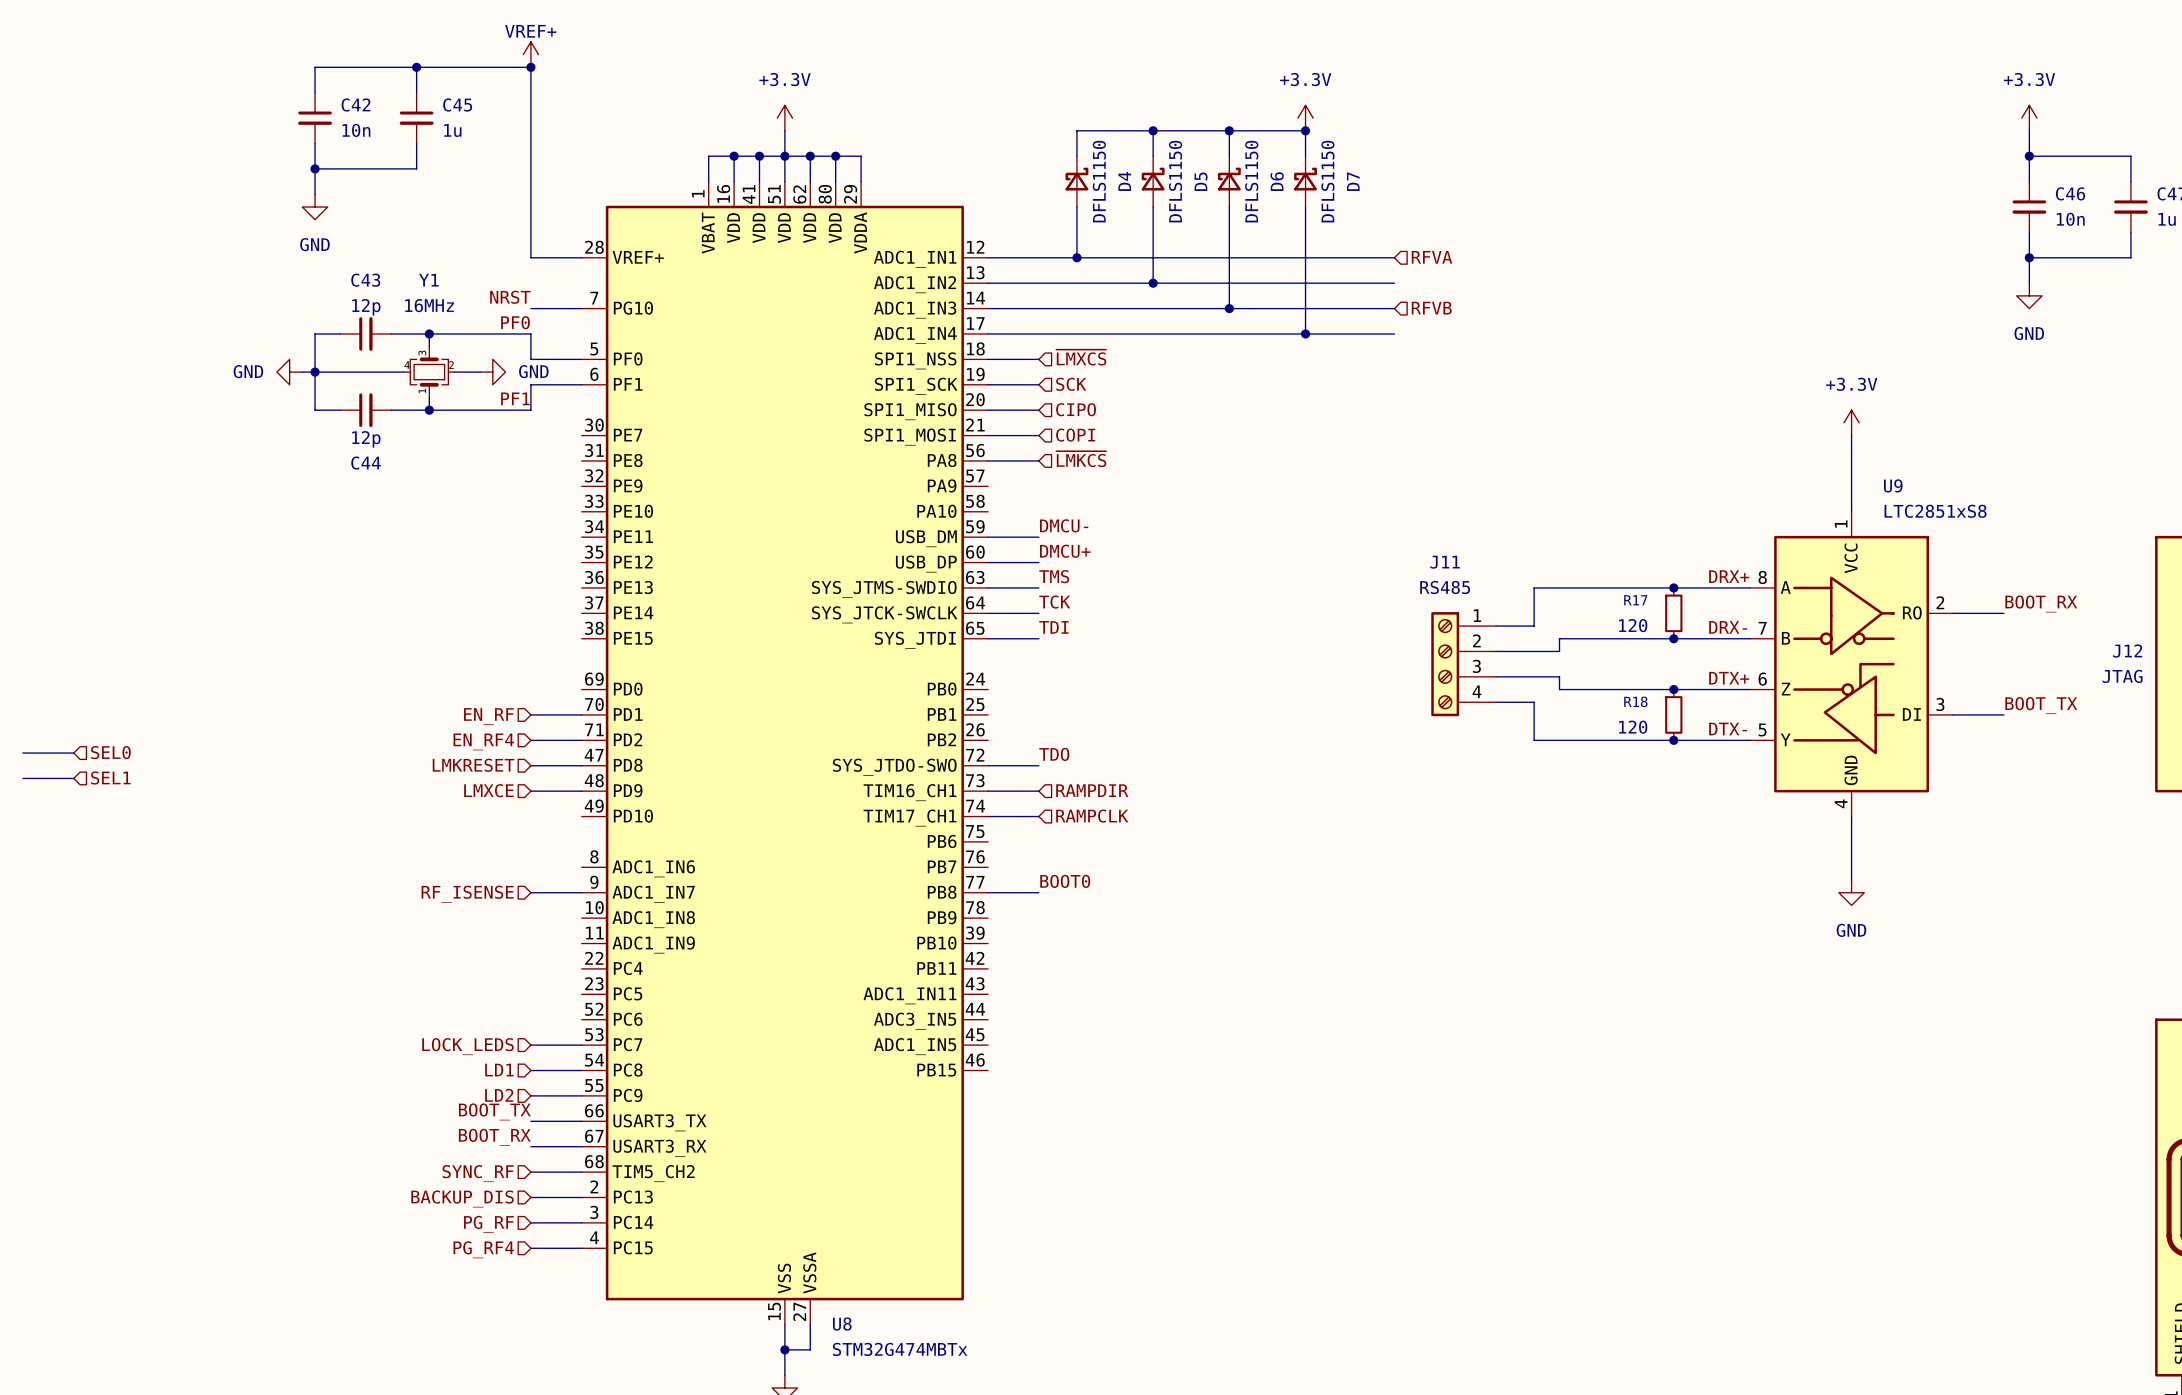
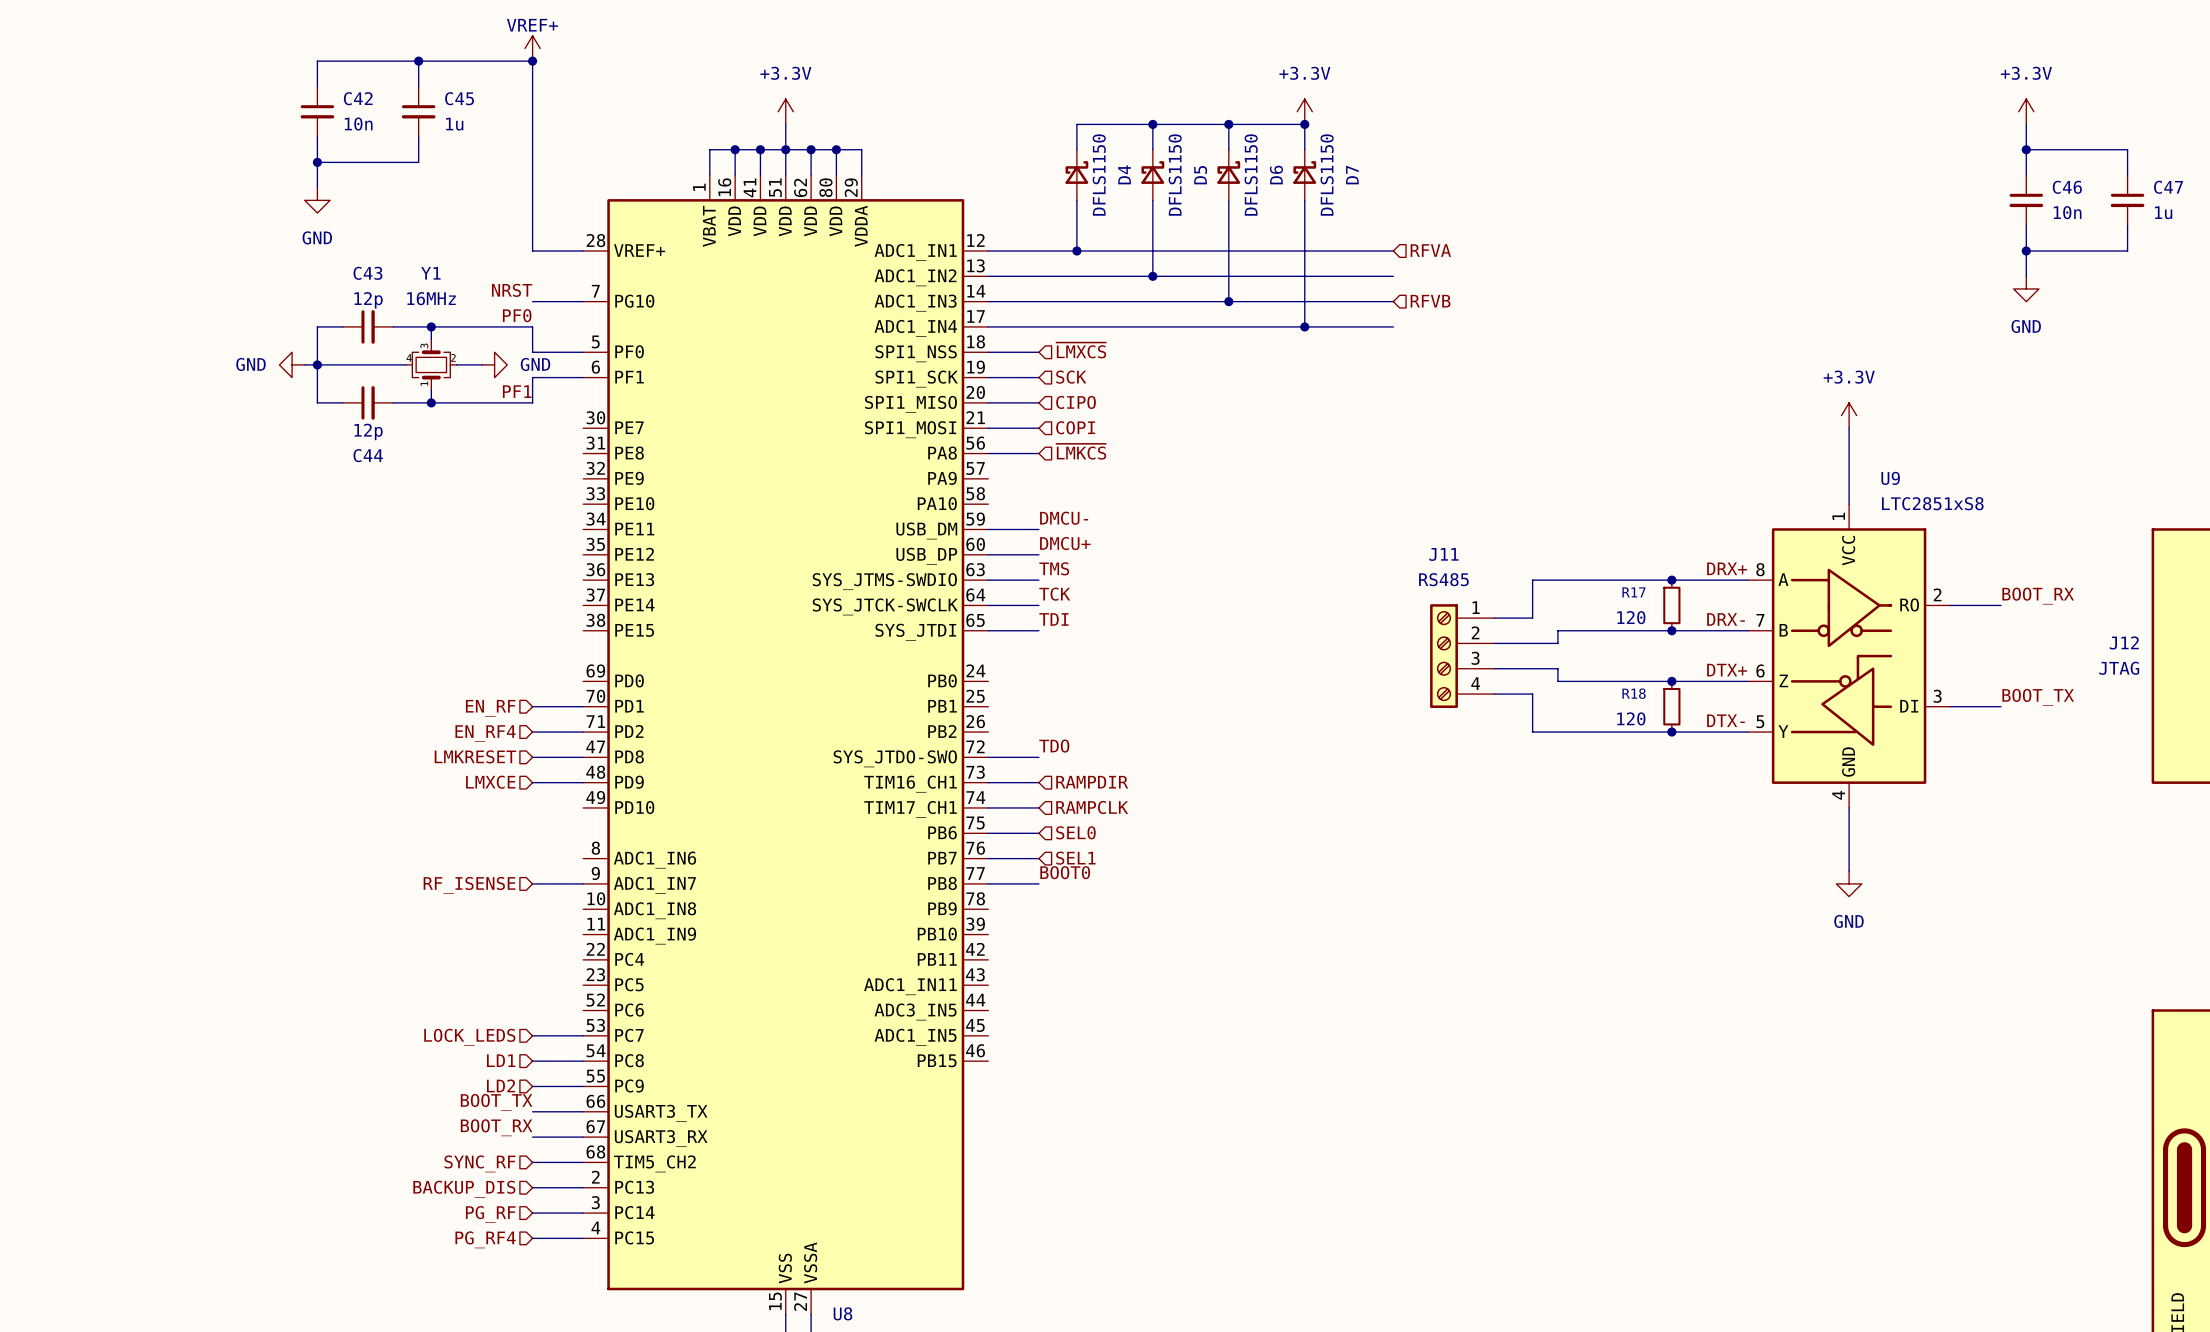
hierarchical label: SEL0 (110, 752) -> none
wire: (22, 753) (73, 753) -> none
hierarchical label: SEL1 (110, 777) -> none
wire: (22, 778) (73, 778) -> none
wire: none -> (988, 833) (1038, 833)
hierarchical label: none -> SEL0 (1075, 832)
hierarchical label: none -> SEL1 (1075, 858)
wire: none -> (988, 858) (1038, 858)

